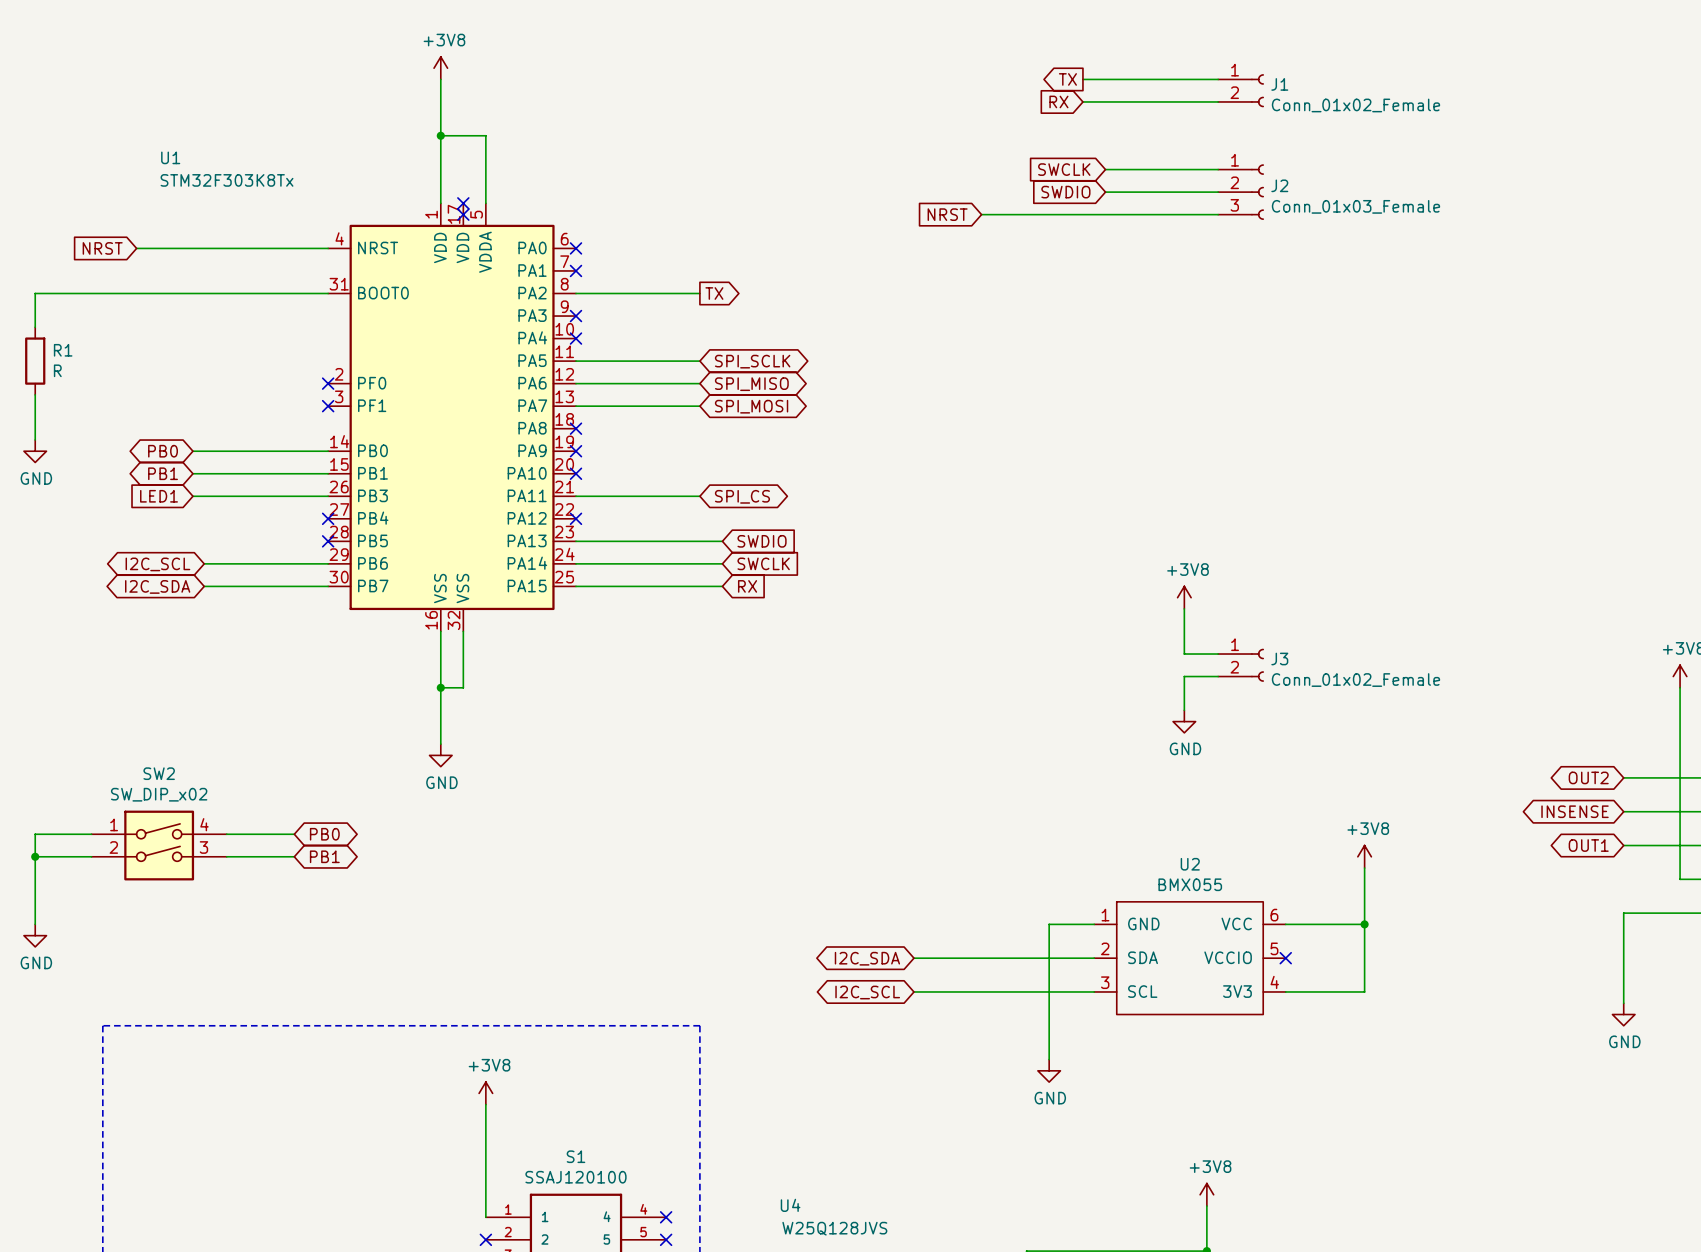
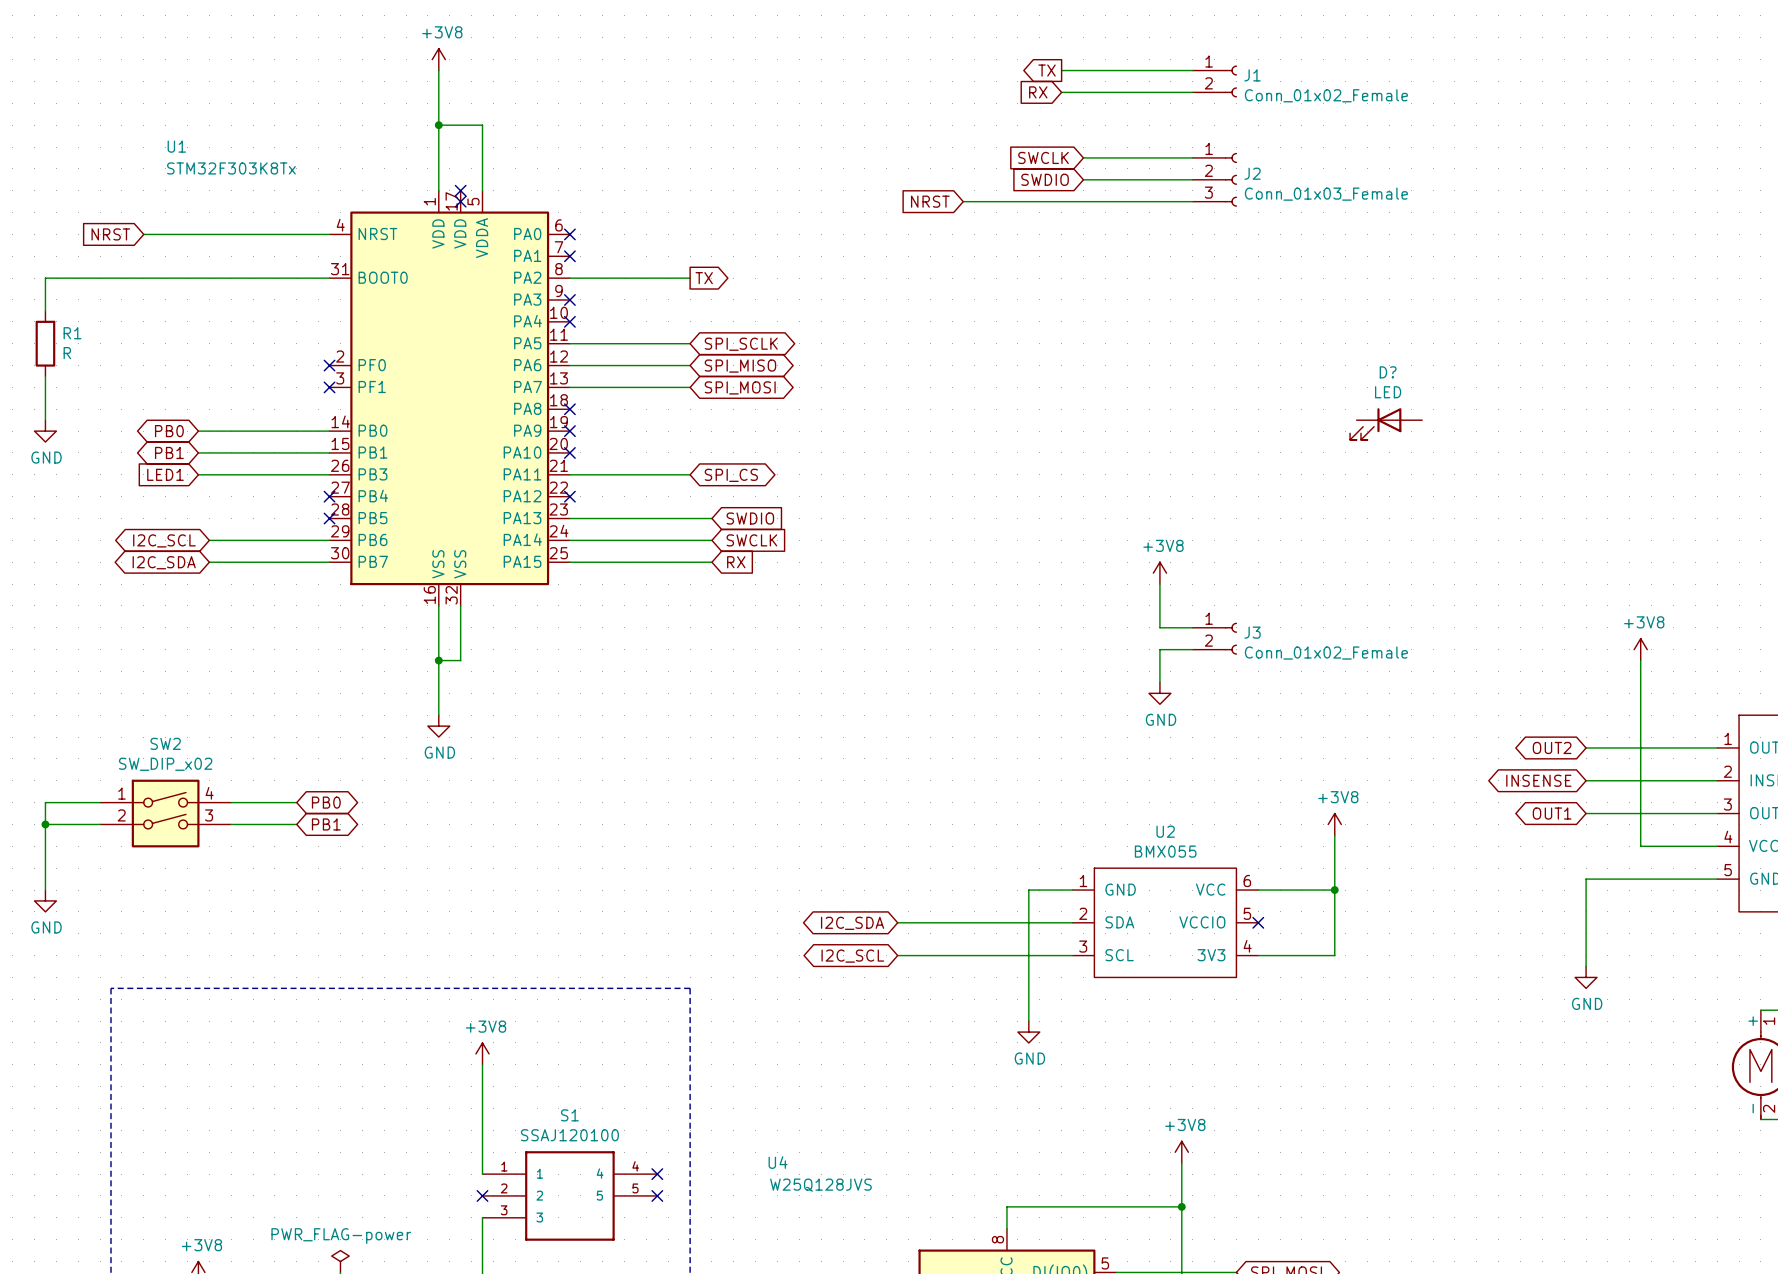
D?: none -> LED (1386, 424)

